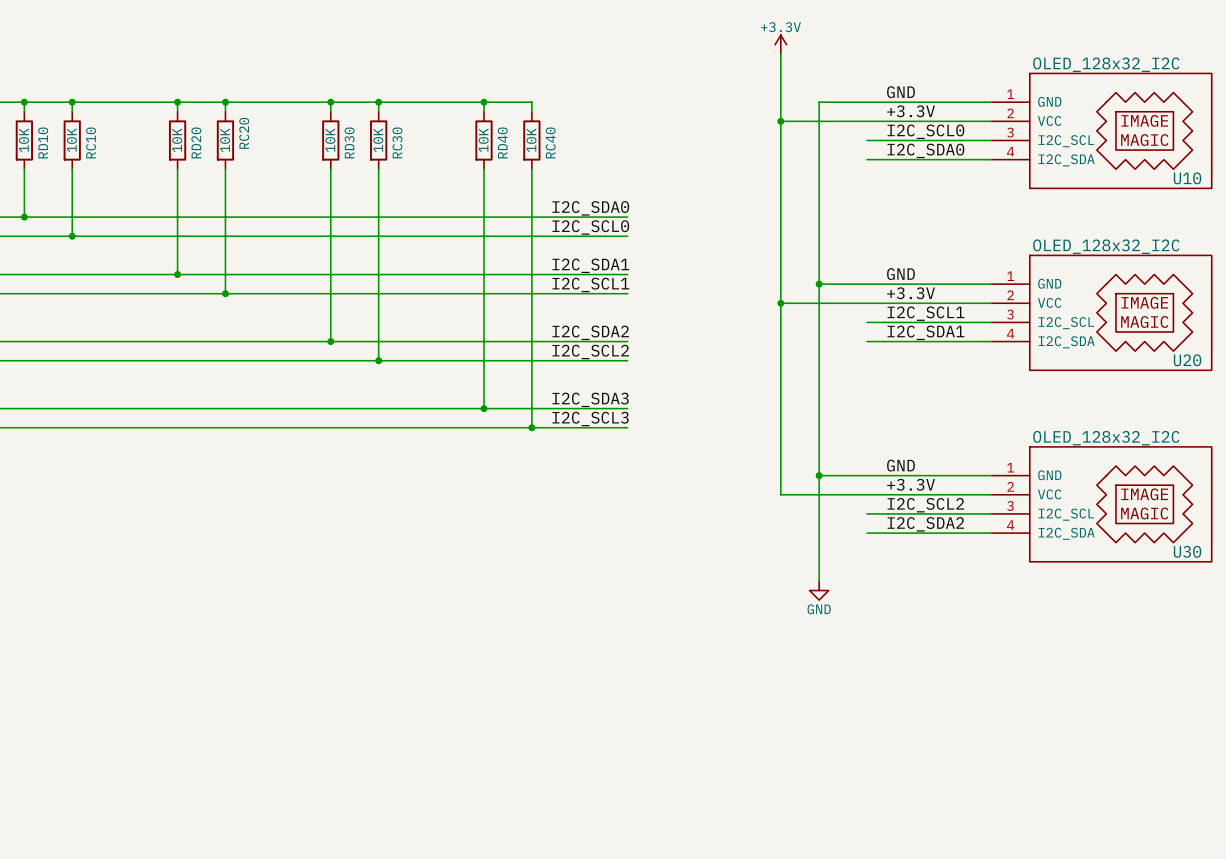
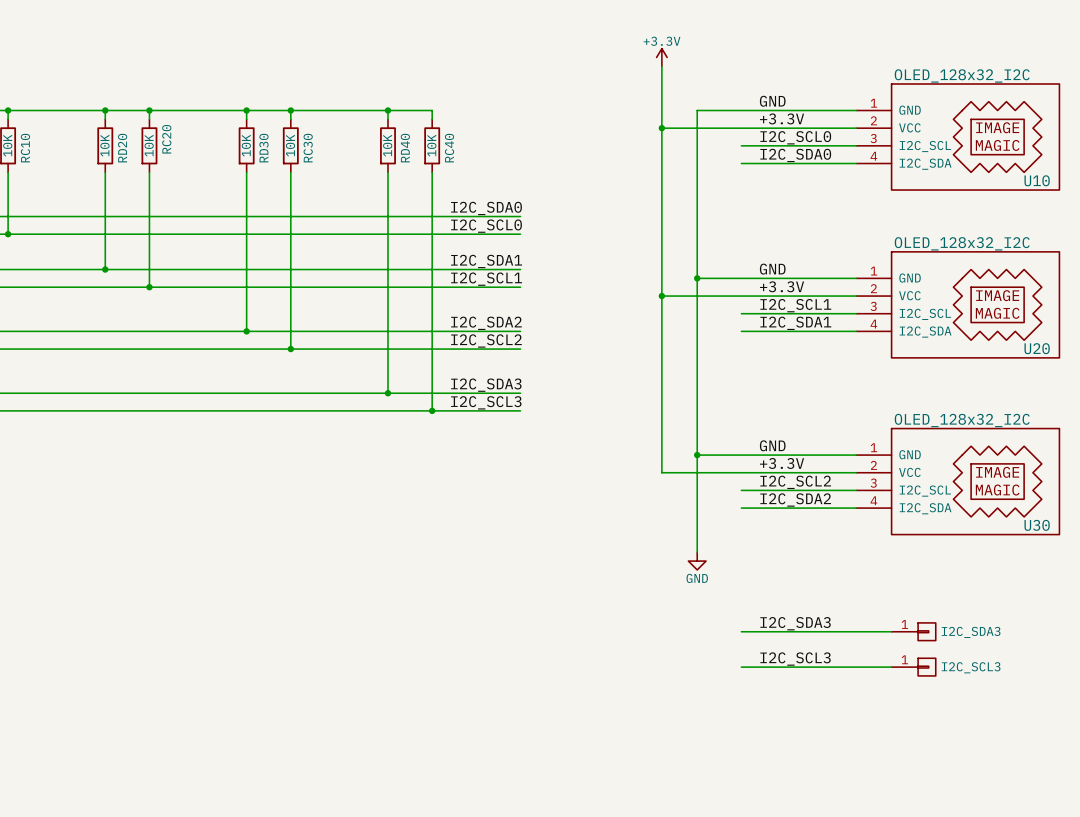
label: none -> I2C_SDA3 (795, 623)
wire: none -> (741, 631) (891, 631)
I2C_SDA3: none -> (913, 631)
label: none -> I2C_SCL3 (795, 659)
wire: none -> (741, 667) (891, 667)
I2C_SCL3: none -> (913, 667)

